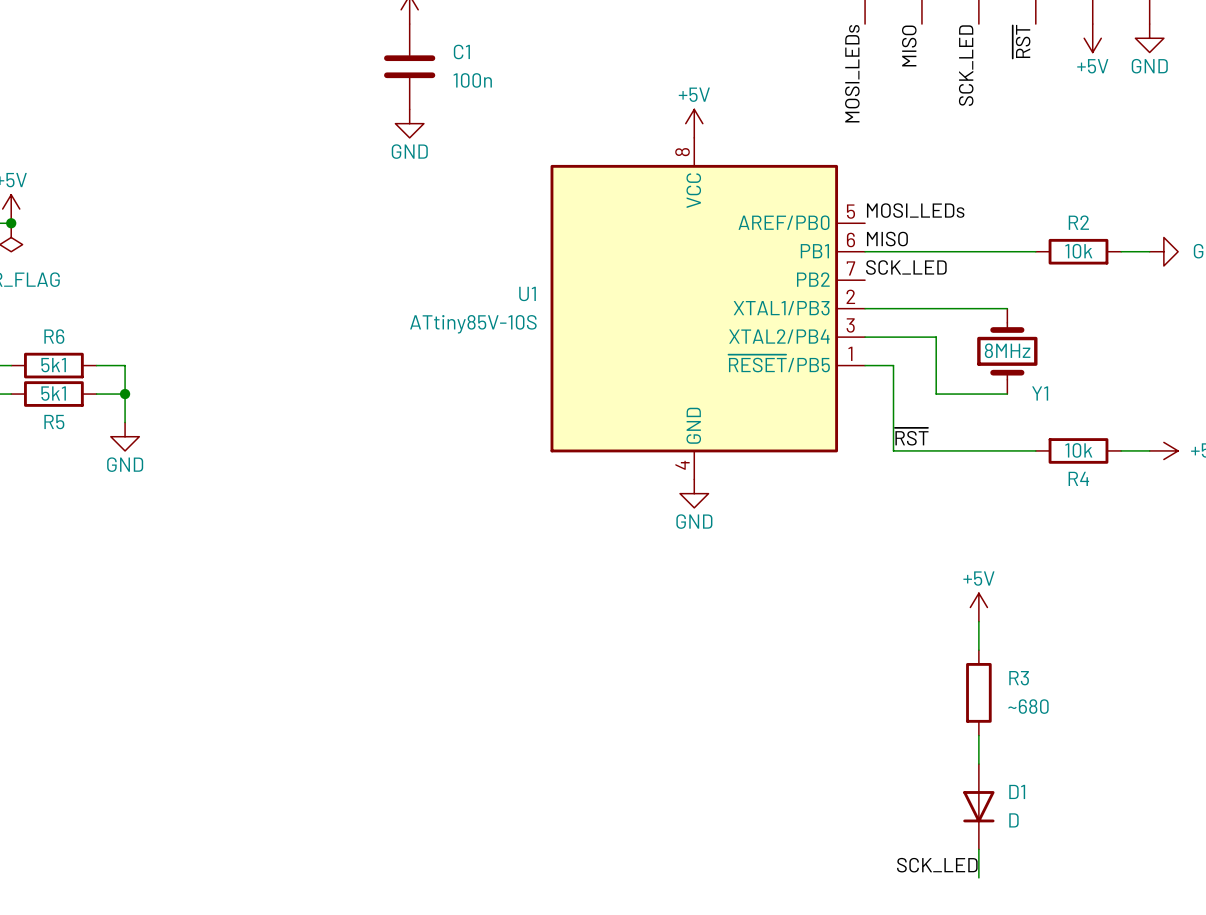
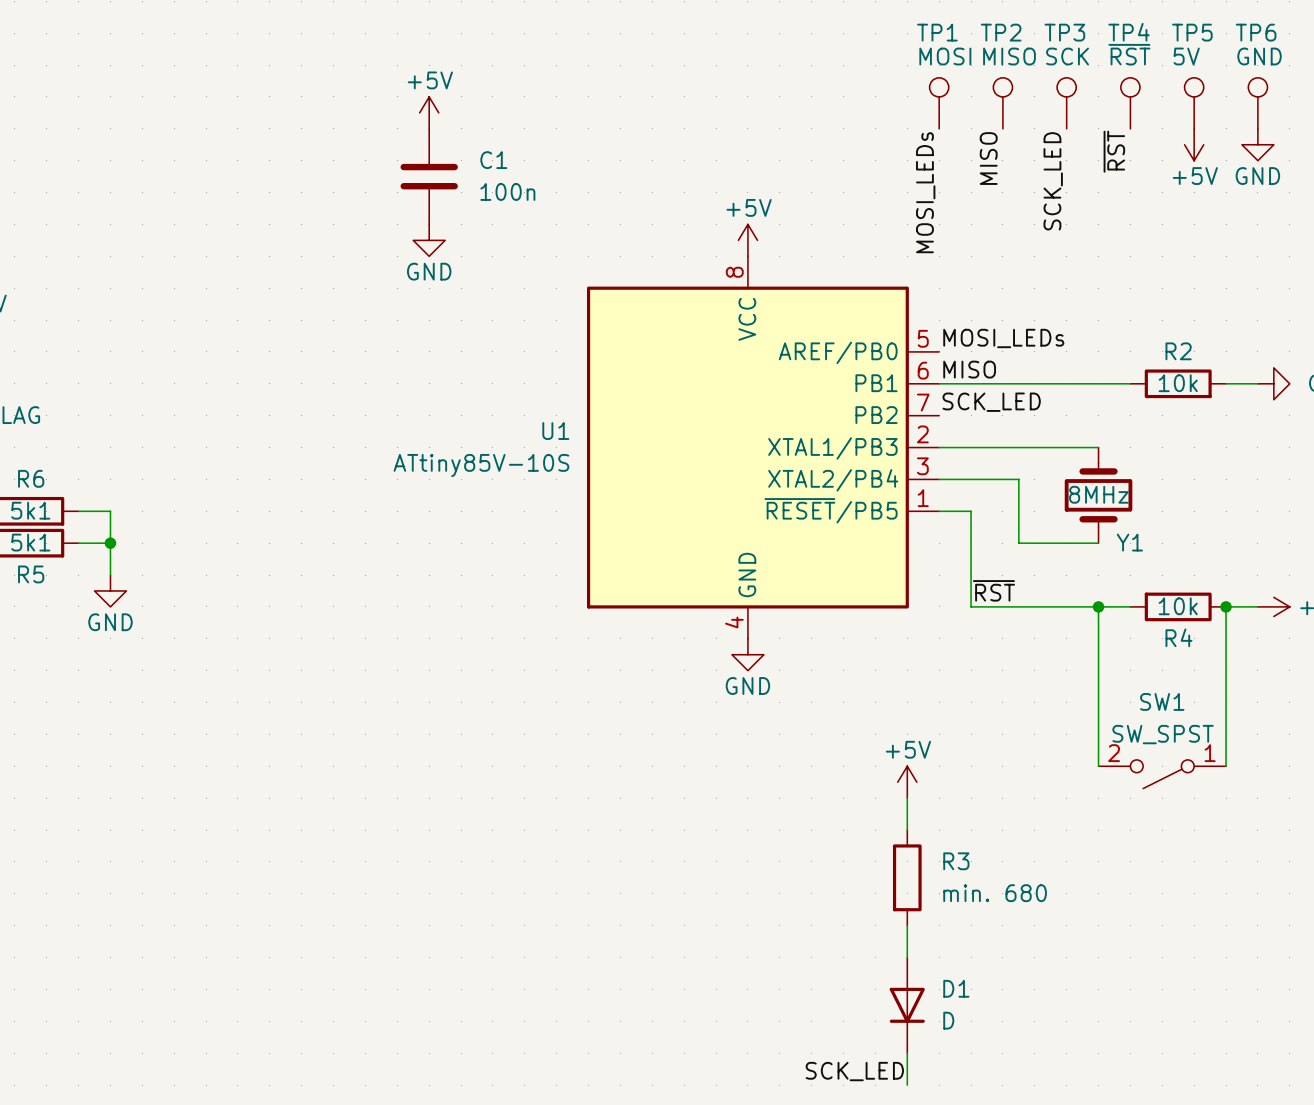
wire: none -> (1098, 606) (1098, 766)
junction: none -> (1098, 606)
wire: none -> (1226, 606) (1226, 766)
junction: none -> (1226, 606)
SW1: none -> SW_SPST (1162, 774)
power symbol position: +5V (978, 607) -> +5V (907, 782)
wire: (978, 621) (978, 650) -> (907, 798) (907, 830)
R3 position: (978, 692) -> (907, 877)
R3 value: ~680 (1028, 706) -> min. 680 (995, 893)
wire: (978, 735) (978, 764) -> (907, 925) (907, 957)
D1 position: (978, 806) -> (907, 1005)
wire: (978, 849) (978, 877) -> (907, 1053) (907, 1085)
label position: SCK_LED (937, 865) -> SCK_LED (854, 1071)

